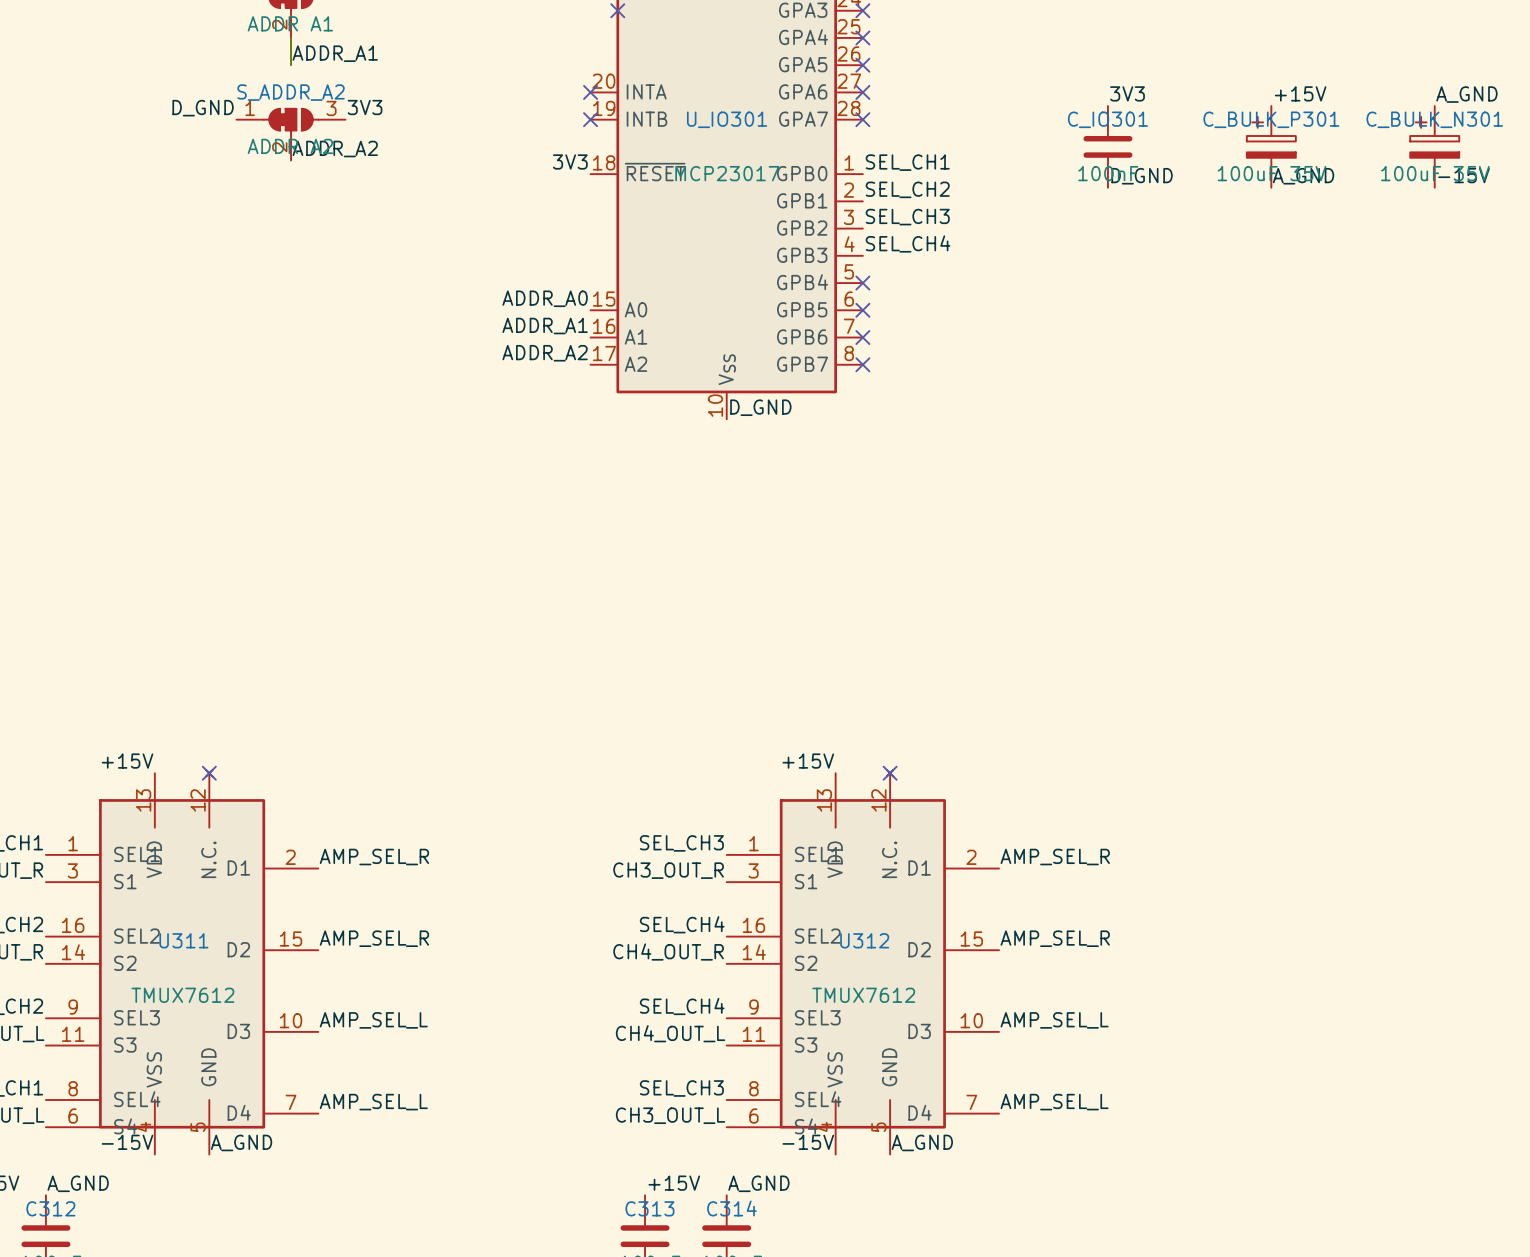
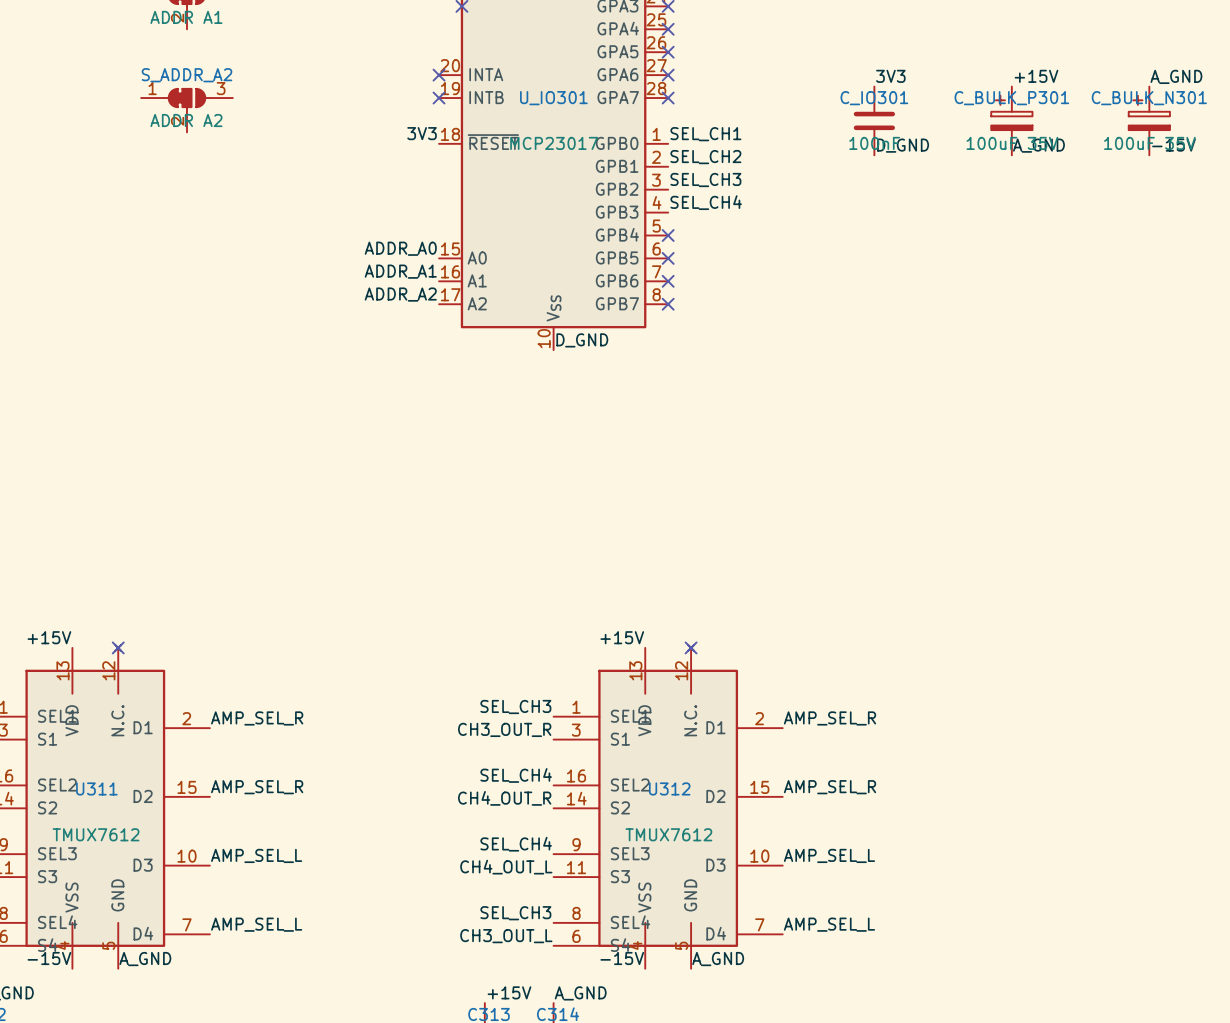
wire: (291, 37) (291, 65) -> none
label: ADDR_A1 (335, 53) -> none
label: 3V3 (365, 107) -> none
label: D_GND (203, 108) -> none
label: ADDR_A2 (335, 149) -> none

